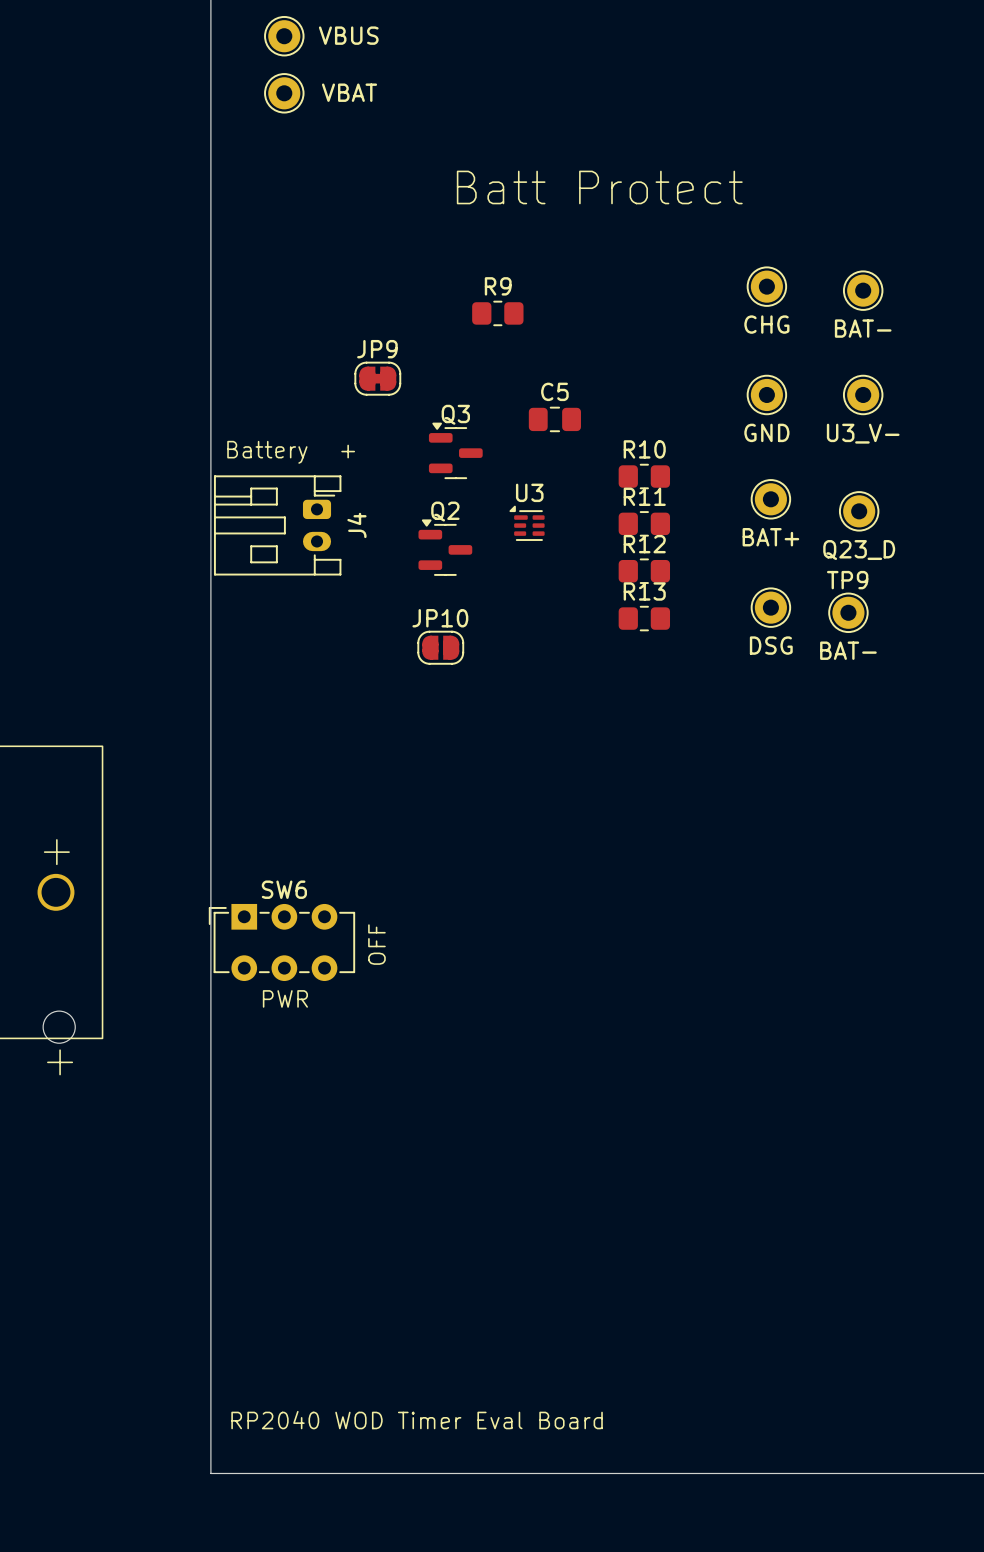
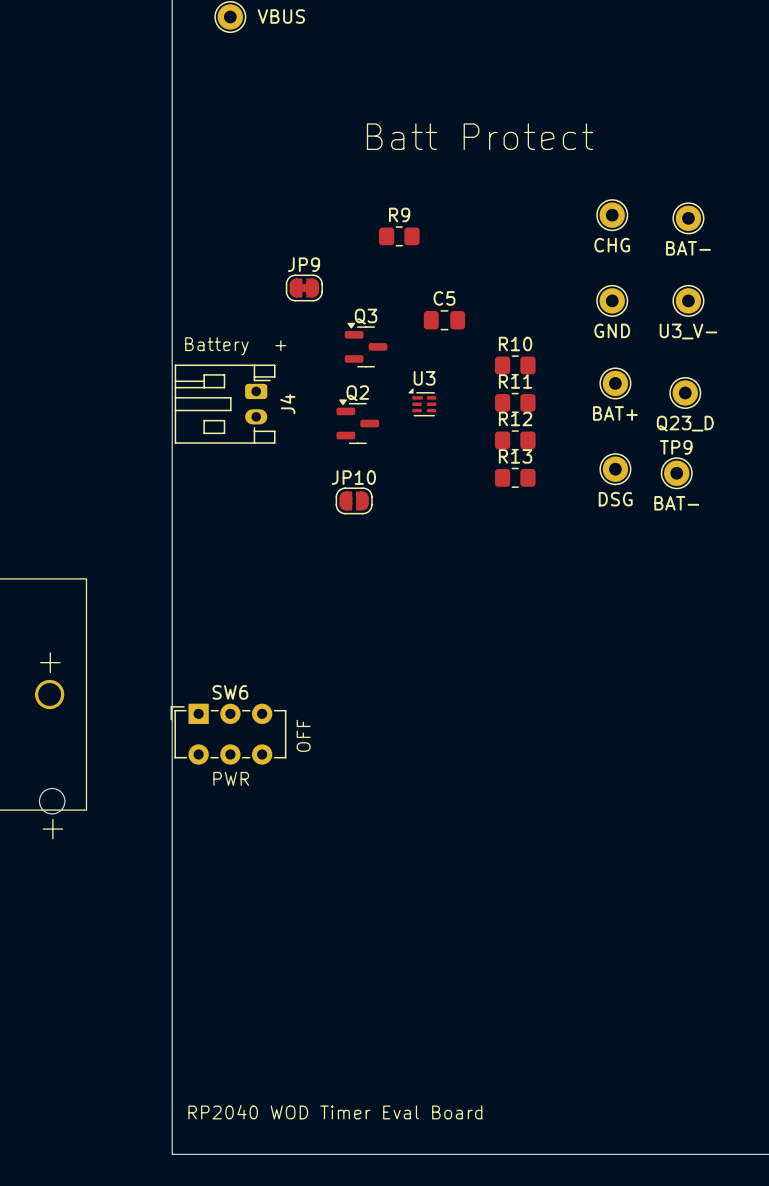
part: (284, 93) -> none

